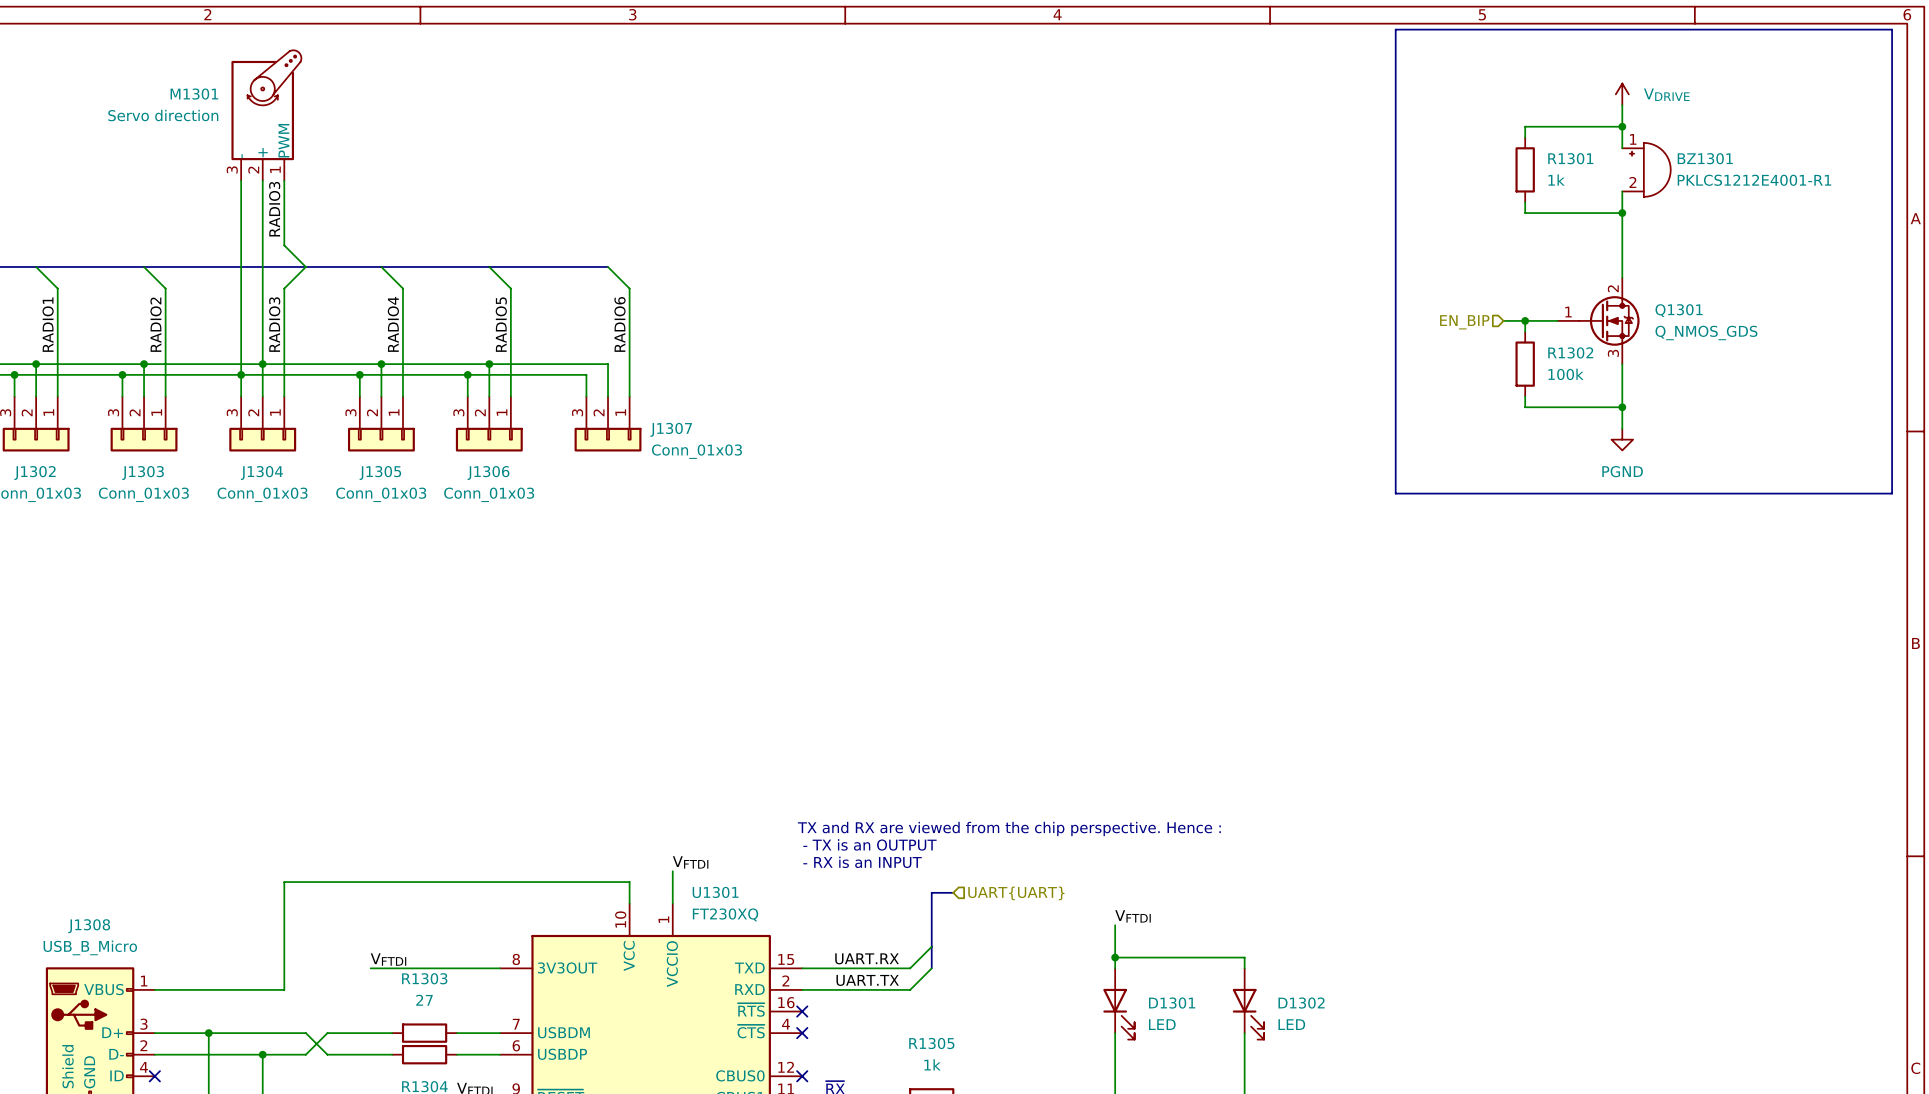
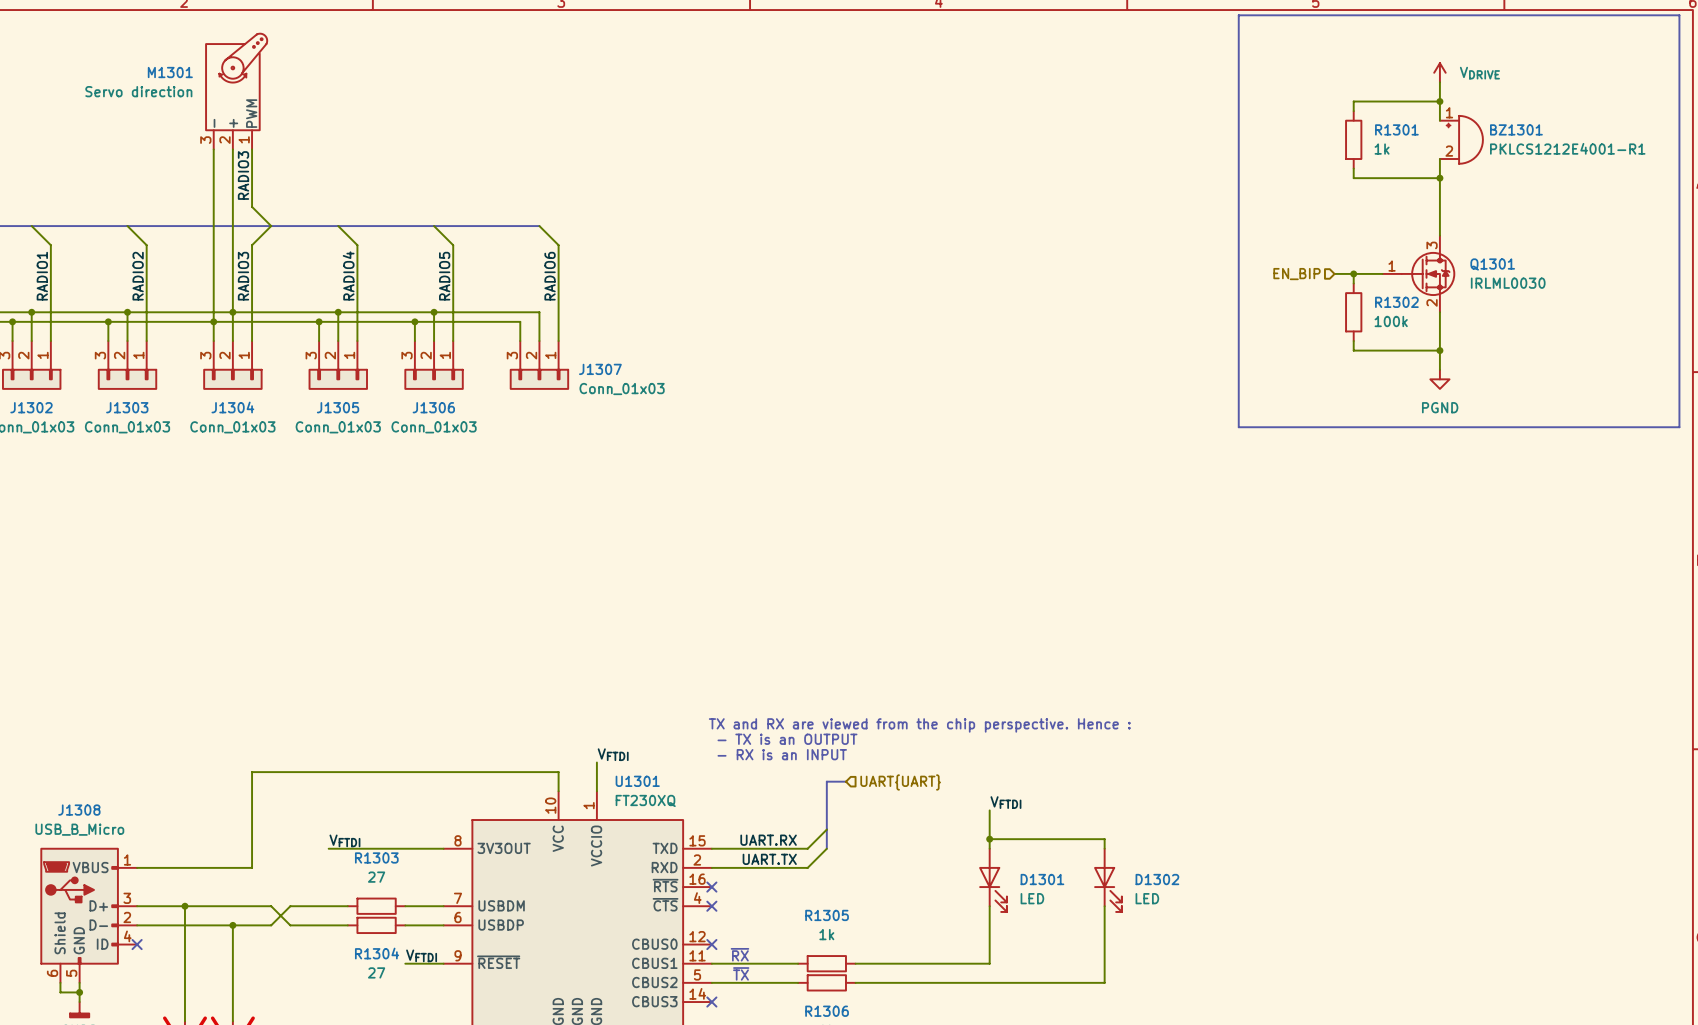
Q1301 pin number: 2 (1613, 288) -> 3 (1432, 245)
Q1301 value: Q_NMOS_GDS (1706, 332) -> IRLML0030 (1508, 283)
Q1301 pin number: 3 (1613, 353) -> 2 (1432, 302)

